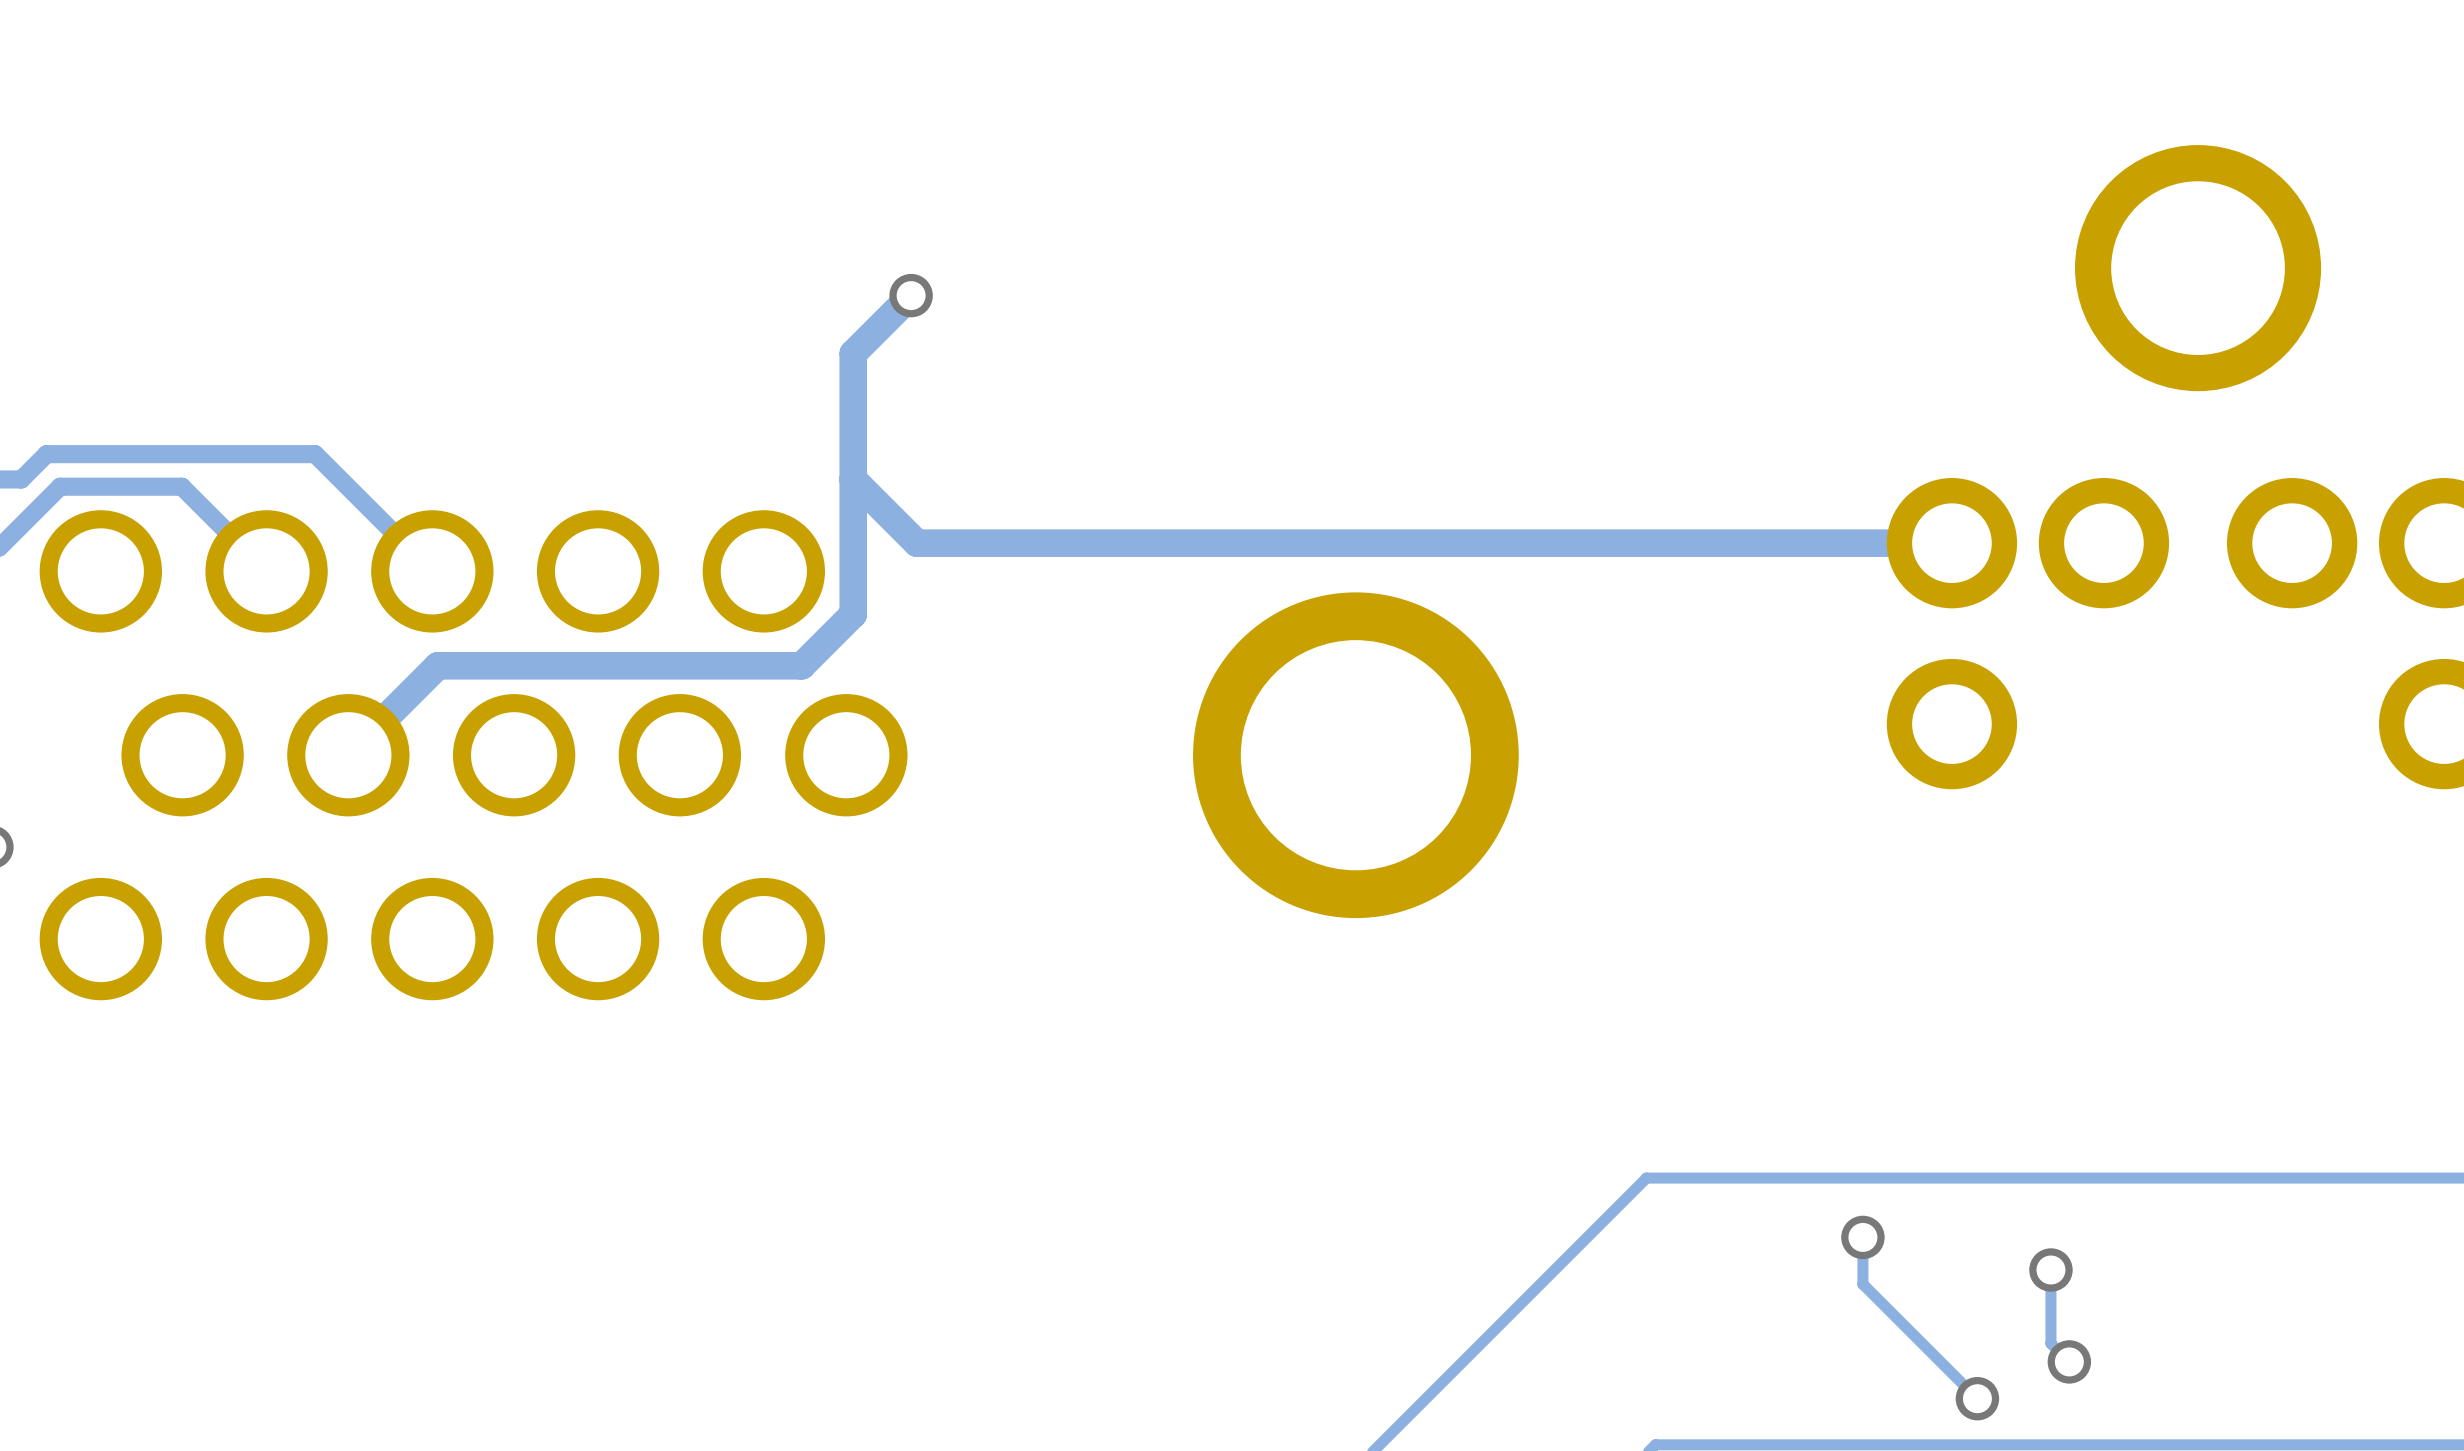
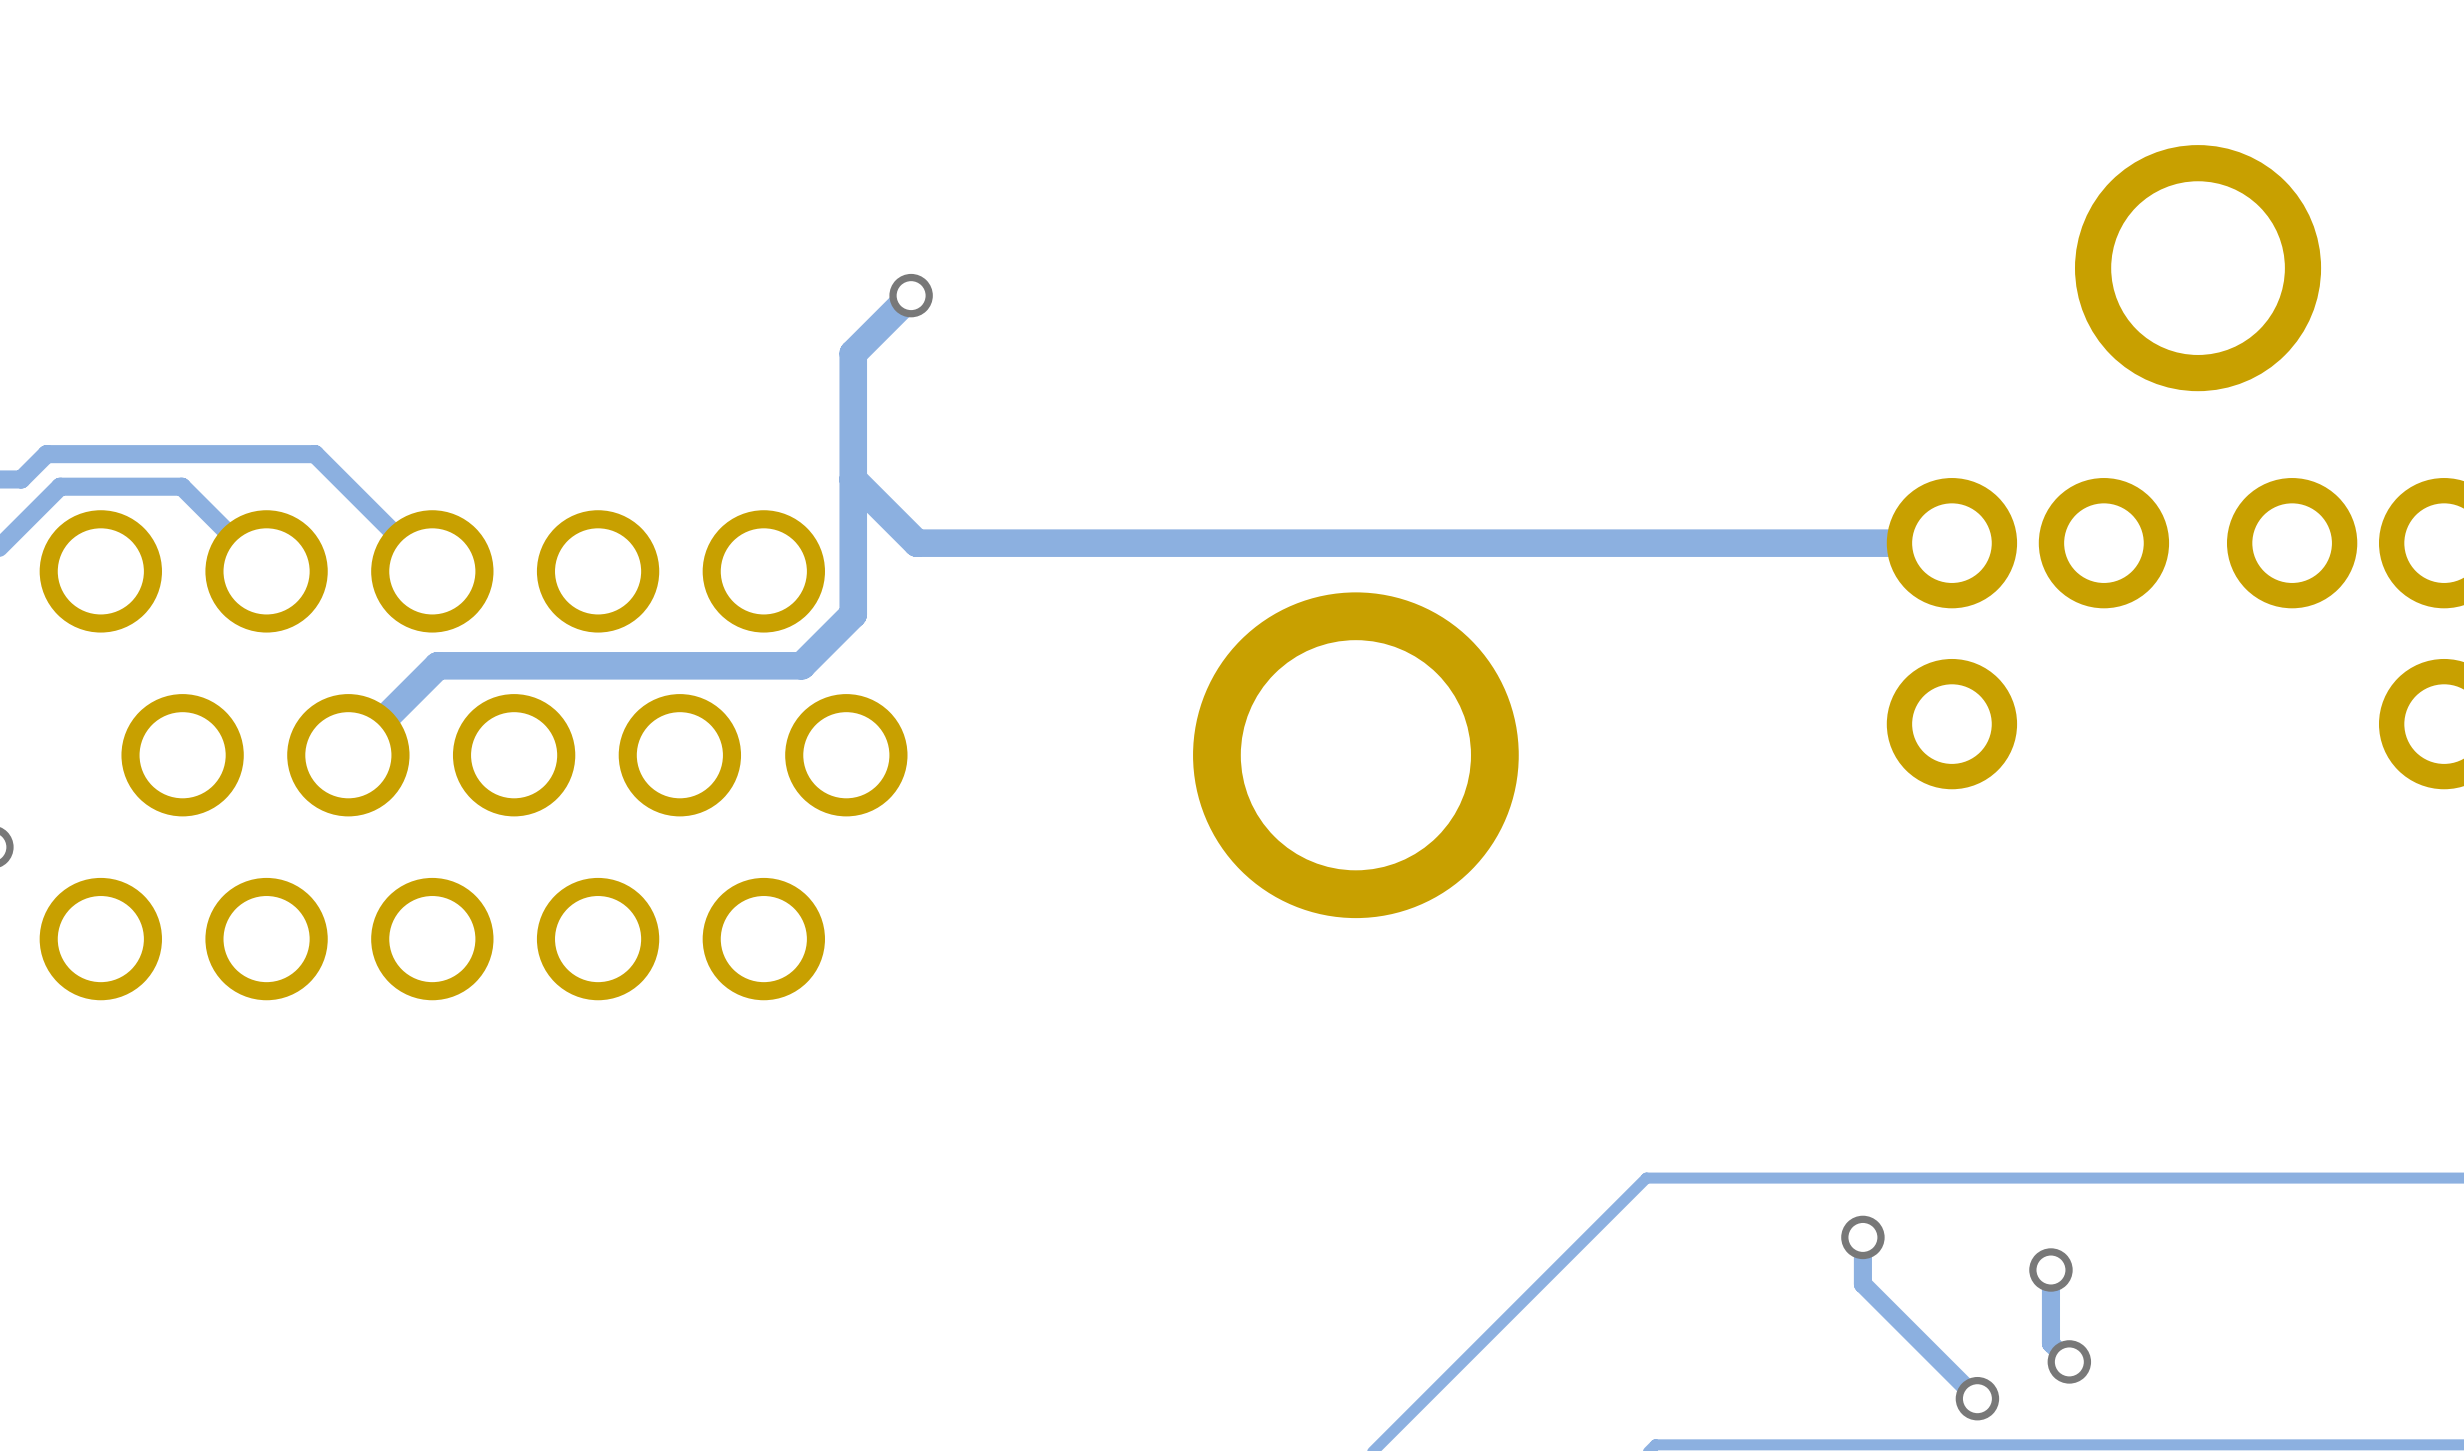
track width: thin (1862, 1237) (1862, 1284) (1977, 1398) -> thick (1862, 1237) (1862, 1284) (1977, 1398)
track width: thin (2050, 1270) (2050, 1343) (2069, 1361) -> thick (2050, 1270) (2050, 1343) (2069, 1361)

